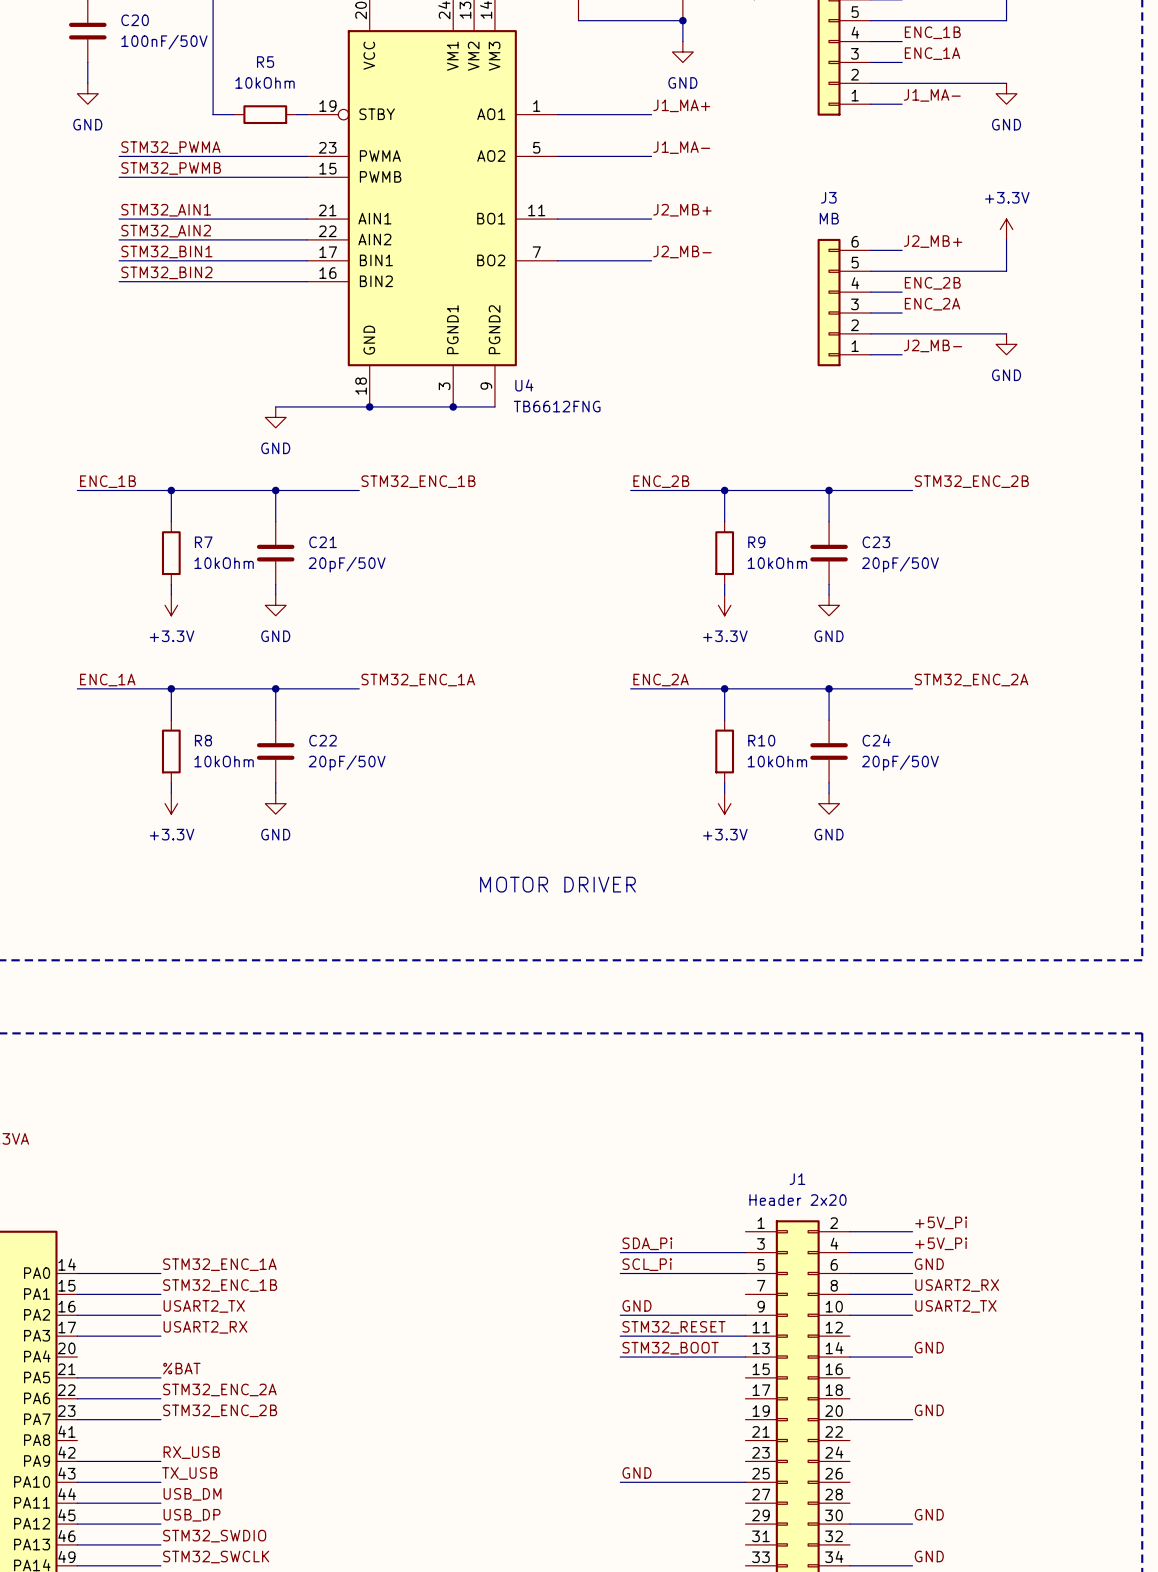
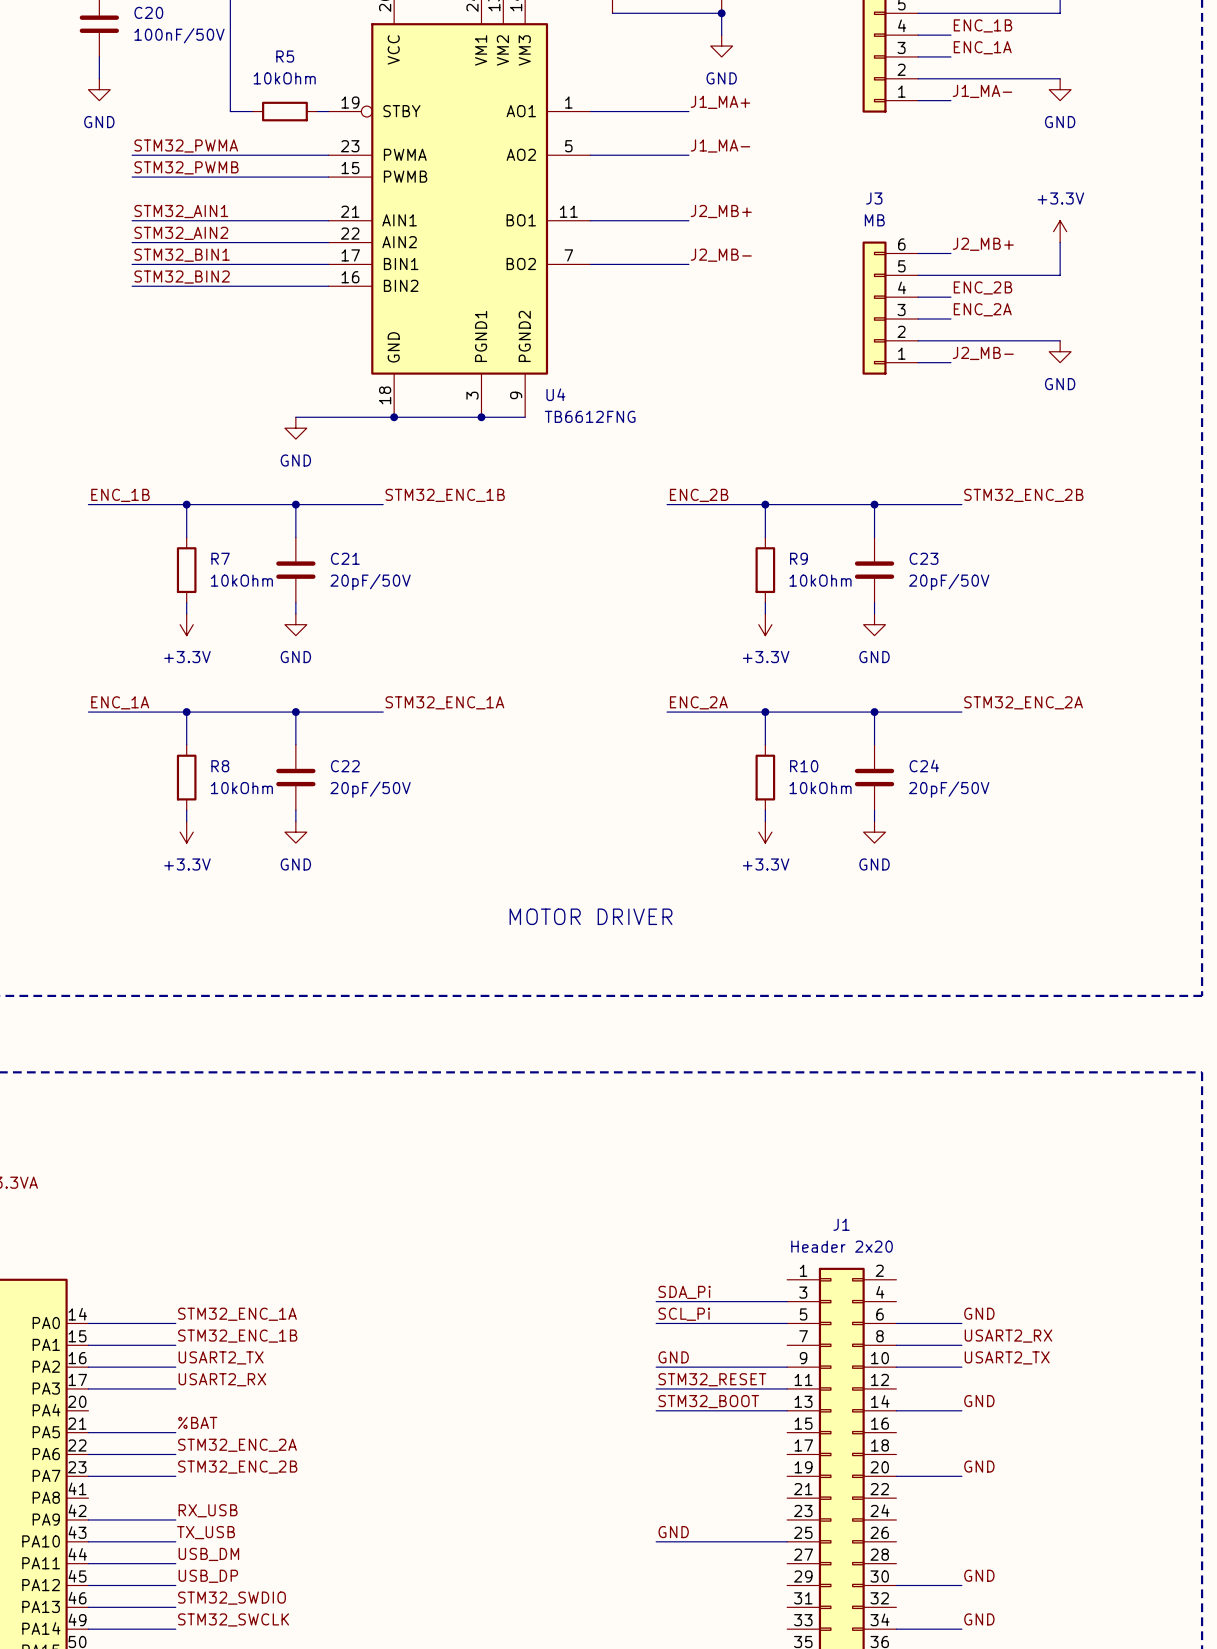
label: +5V_Pi (941, 1222) -> none
wire: (849, 1231) (912, 1231) -> none
label: +5V_Pi (941, 1243) -> none
wire: (849, 1252) (912, 1252) -> none

